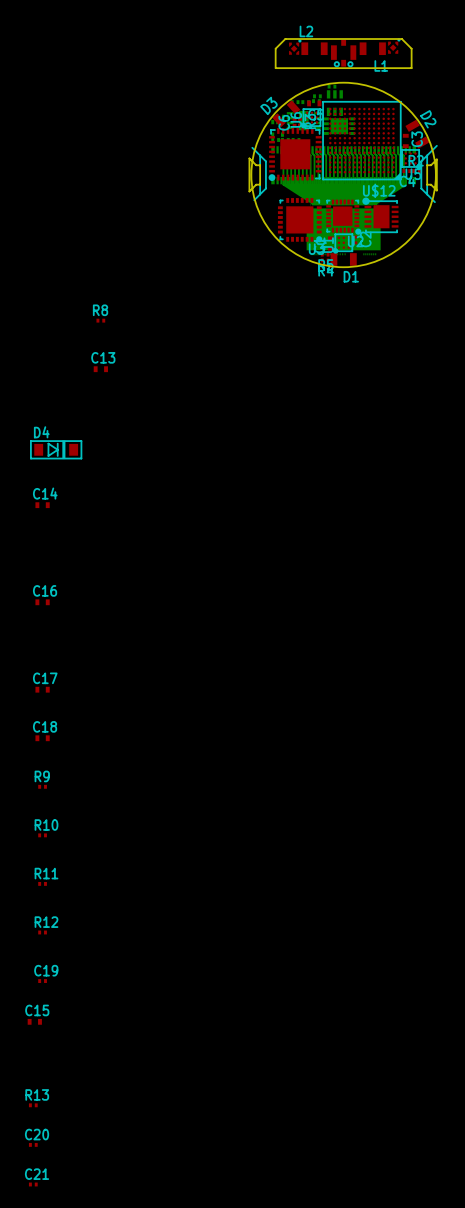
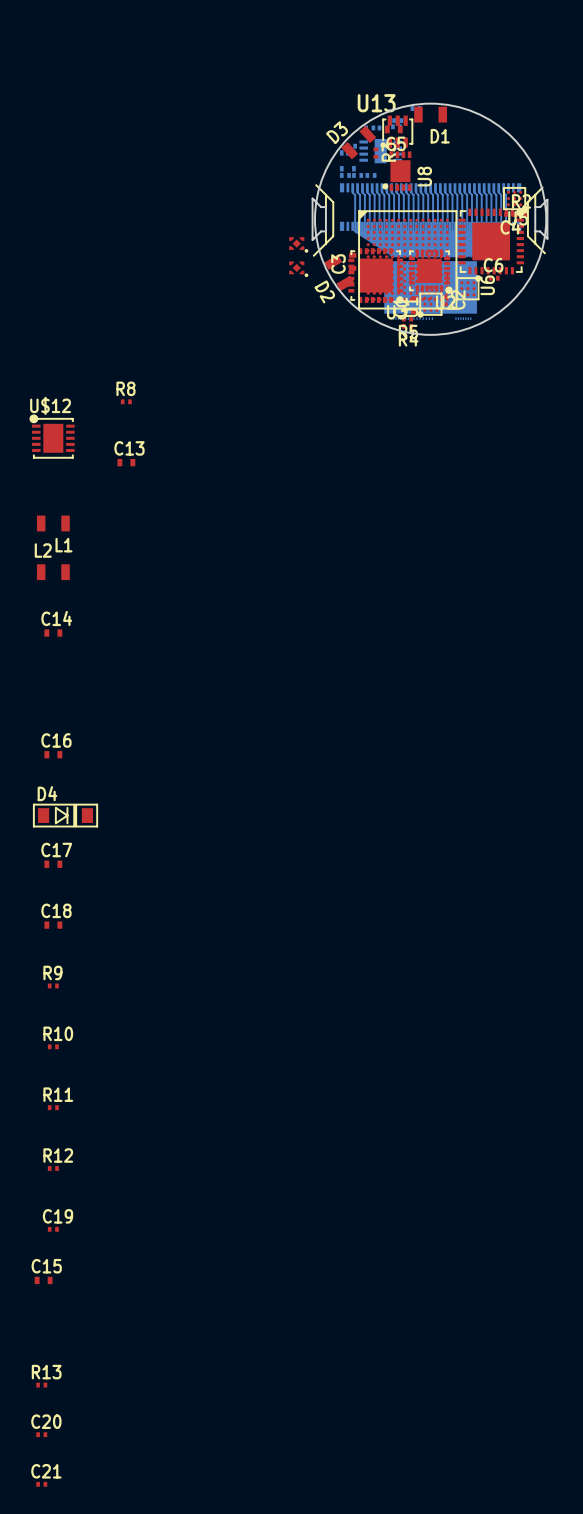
board edge: (285, 39) (401, 39) (411, 48) (411, 68) (275, 68) (275, 48) (285, 39) -> none
part: (394, 46) -> none
part: (295, 47) -> none
L2 position: (314, 48) -> (53, 572)
L1 position: (372, 48) -> (53, 523)
part: (343, 53) -> none
U13 side: bottom (334, 103) -> top (396, 131)
U6 rotation: 0° (311, 118) -> 180° (468, 287)
U6 position: (311, 118) -> (468, 287)
D2 name position: D2 (428, 119) -> D2 (324, 291)
C6 rotation: 0° (294, 122) -> 90° clockwise (494, 278)
C6 position: (294, 122) -> (494, 278)
U8 side: bottom (339, 126) -> top (396, 171)
D2 position: (417, 134) -> (339, 272)
C3 name position: C3 (417, 139) -> C3 (338, 264)
part rotation: 0° (361, 140) -> 180° (407, 259)
part position: (361, 140) -> (407, 259)
C3 position: (405, 140) -> (352, 261)
line: (436, 145) (432, 149) -> (318, 250) (313, 255)
part rotation: 0° (295, 154) -> 180° (491, 241)
part position: (295, 154) -> (491, 241)
part: none -> (298, 244)
part: none -> (298, 269)
U$12 position: (380, 215) -> (52, 436)
D1 position: (343, 259) -> (430, 114)
D4 position: (56, 449) -> (65, 815)

